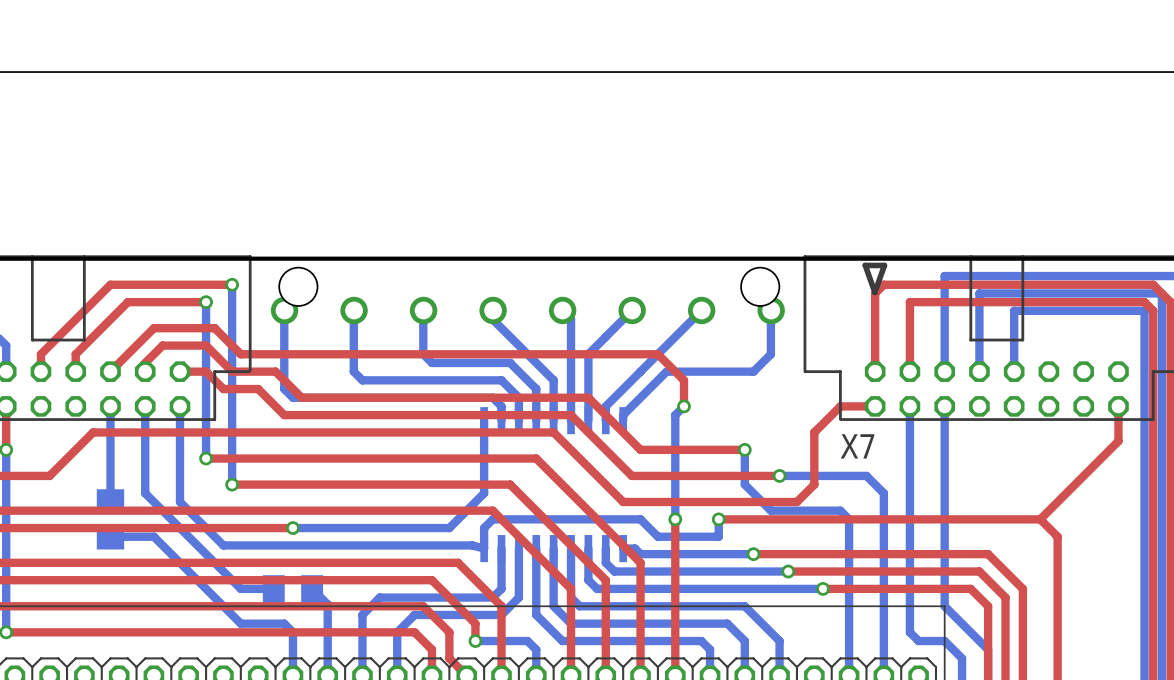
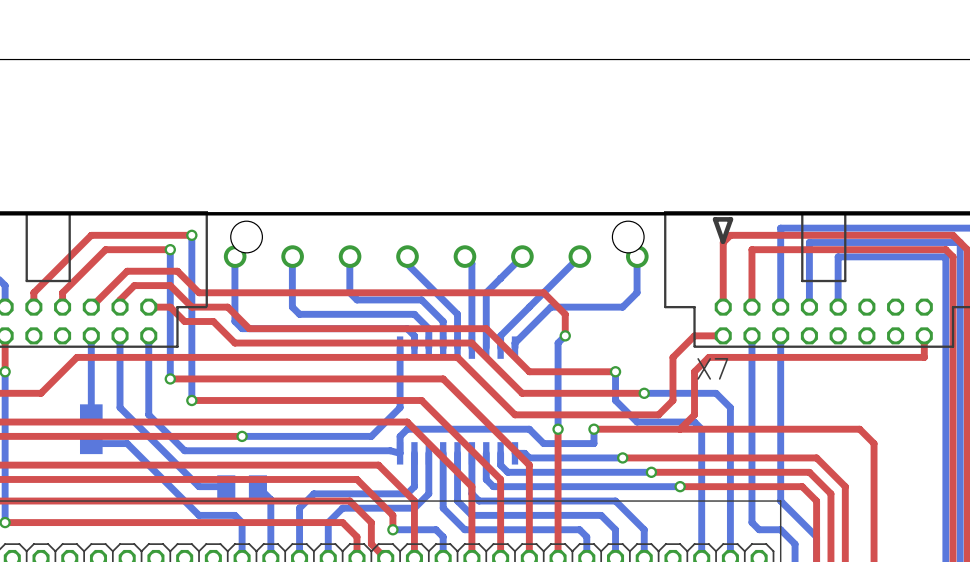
top track: (1118, 432) (1118, 441) (1040, 519) -> (924, 357) (708, 357) (694, 371) (694, 414) (680, 429)

